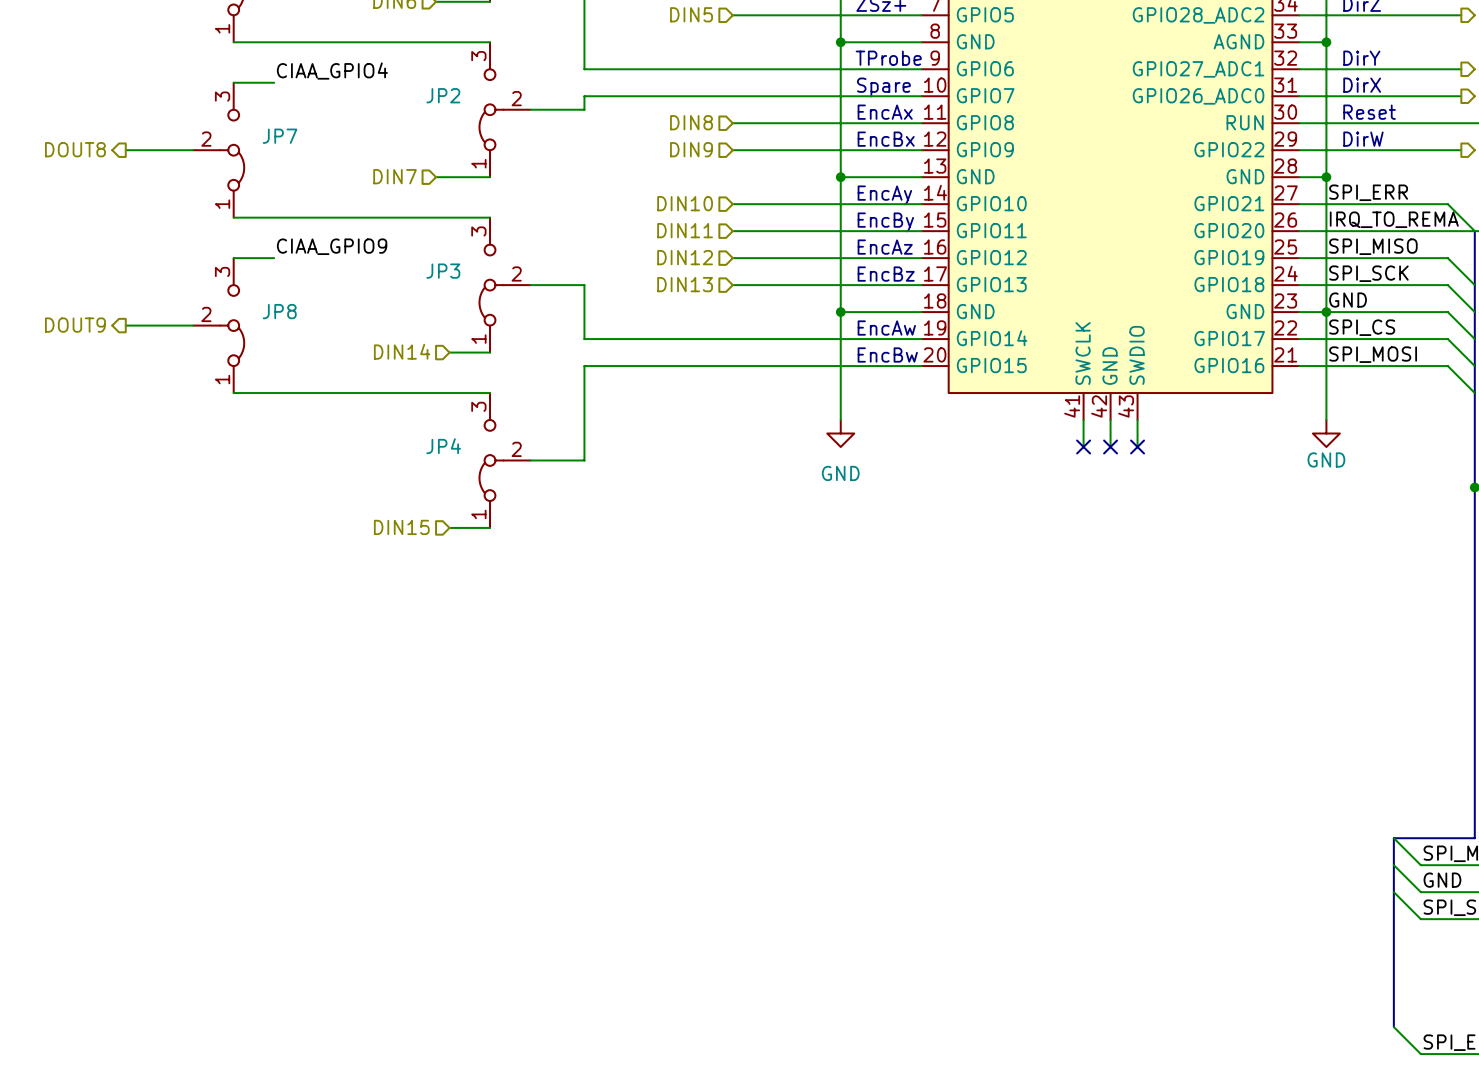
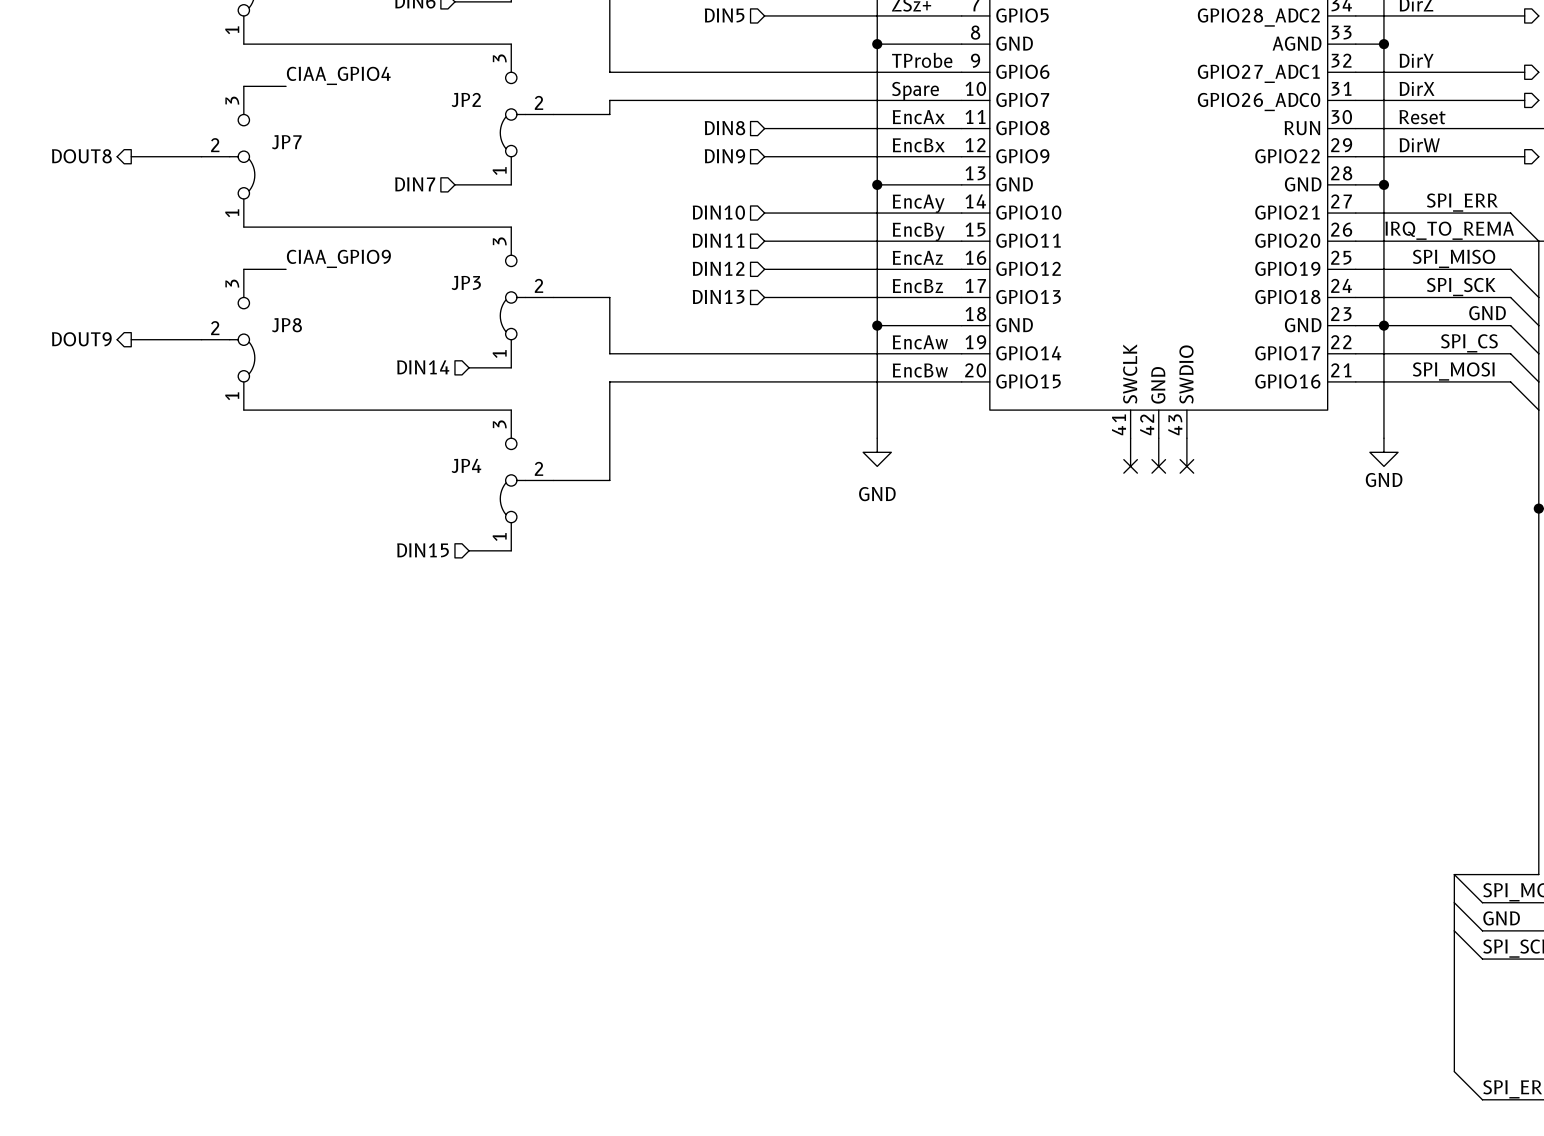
label position: SPI_ERR (1368, 192) -> SPI_ERR (1462, 202)
label position: SPI_MISO (1373, 246) -> SPI_MISO (1454, 258)
label position: SPI_SCK (1368, 273) -> SPI_SCK (1461, 287)
label position: GND (1348, 300) -> GND (1487, 313)
label position: SPI_CS (1362, 327) -> SPI_CS (1469, 343)
label position: SPI_MOSI (1373, 354) -> SPI_MOSI (1453, 371)

